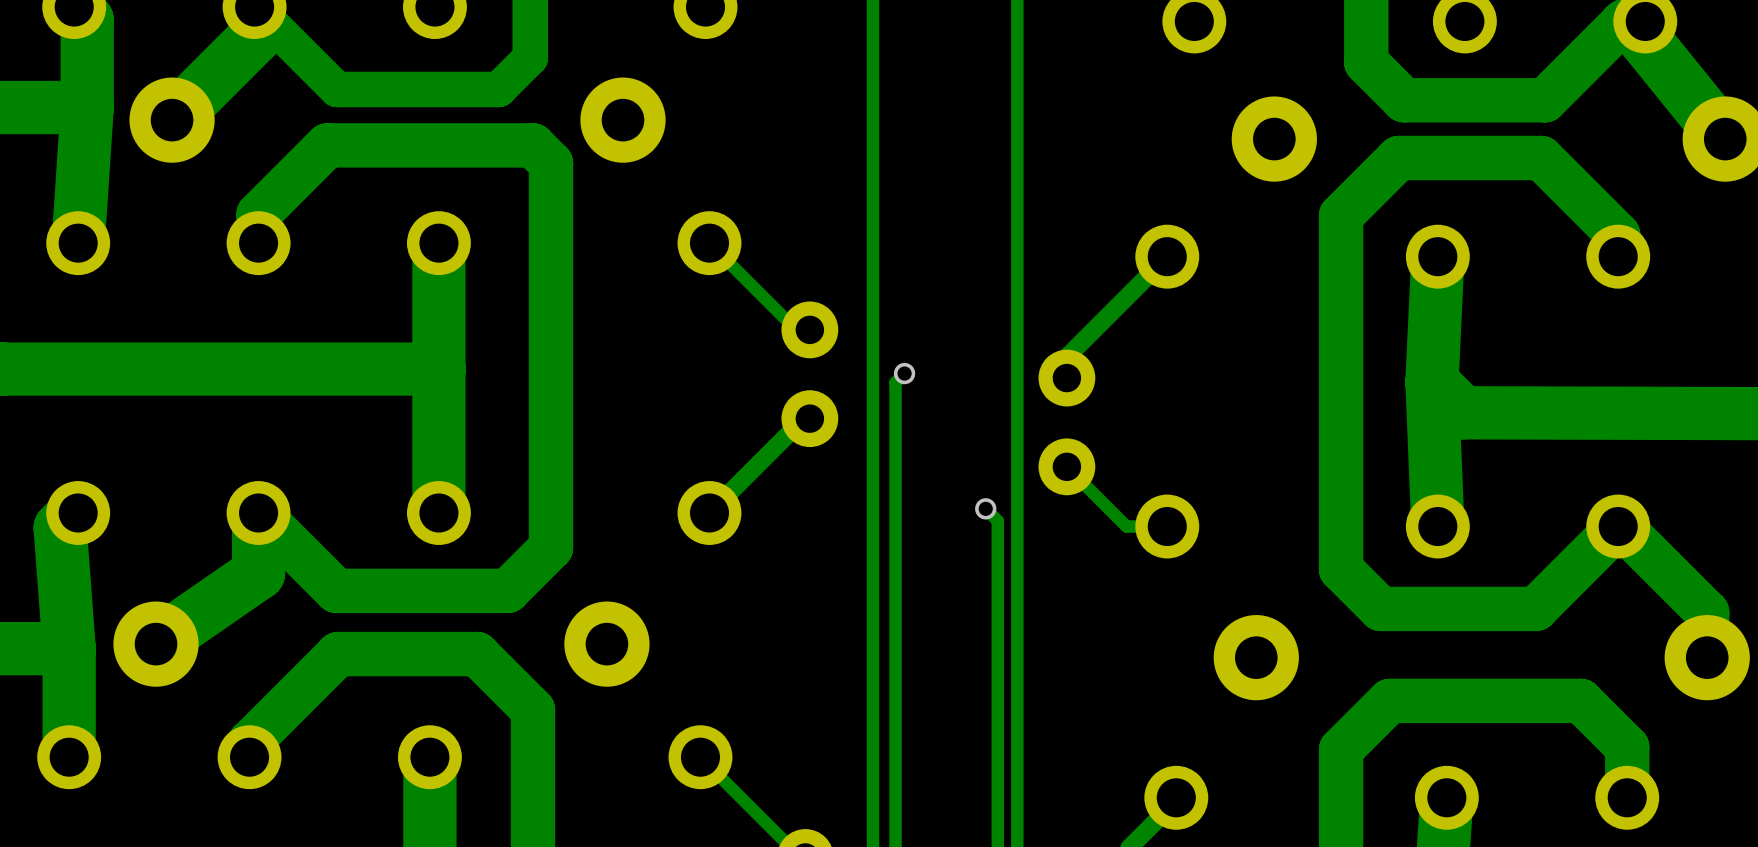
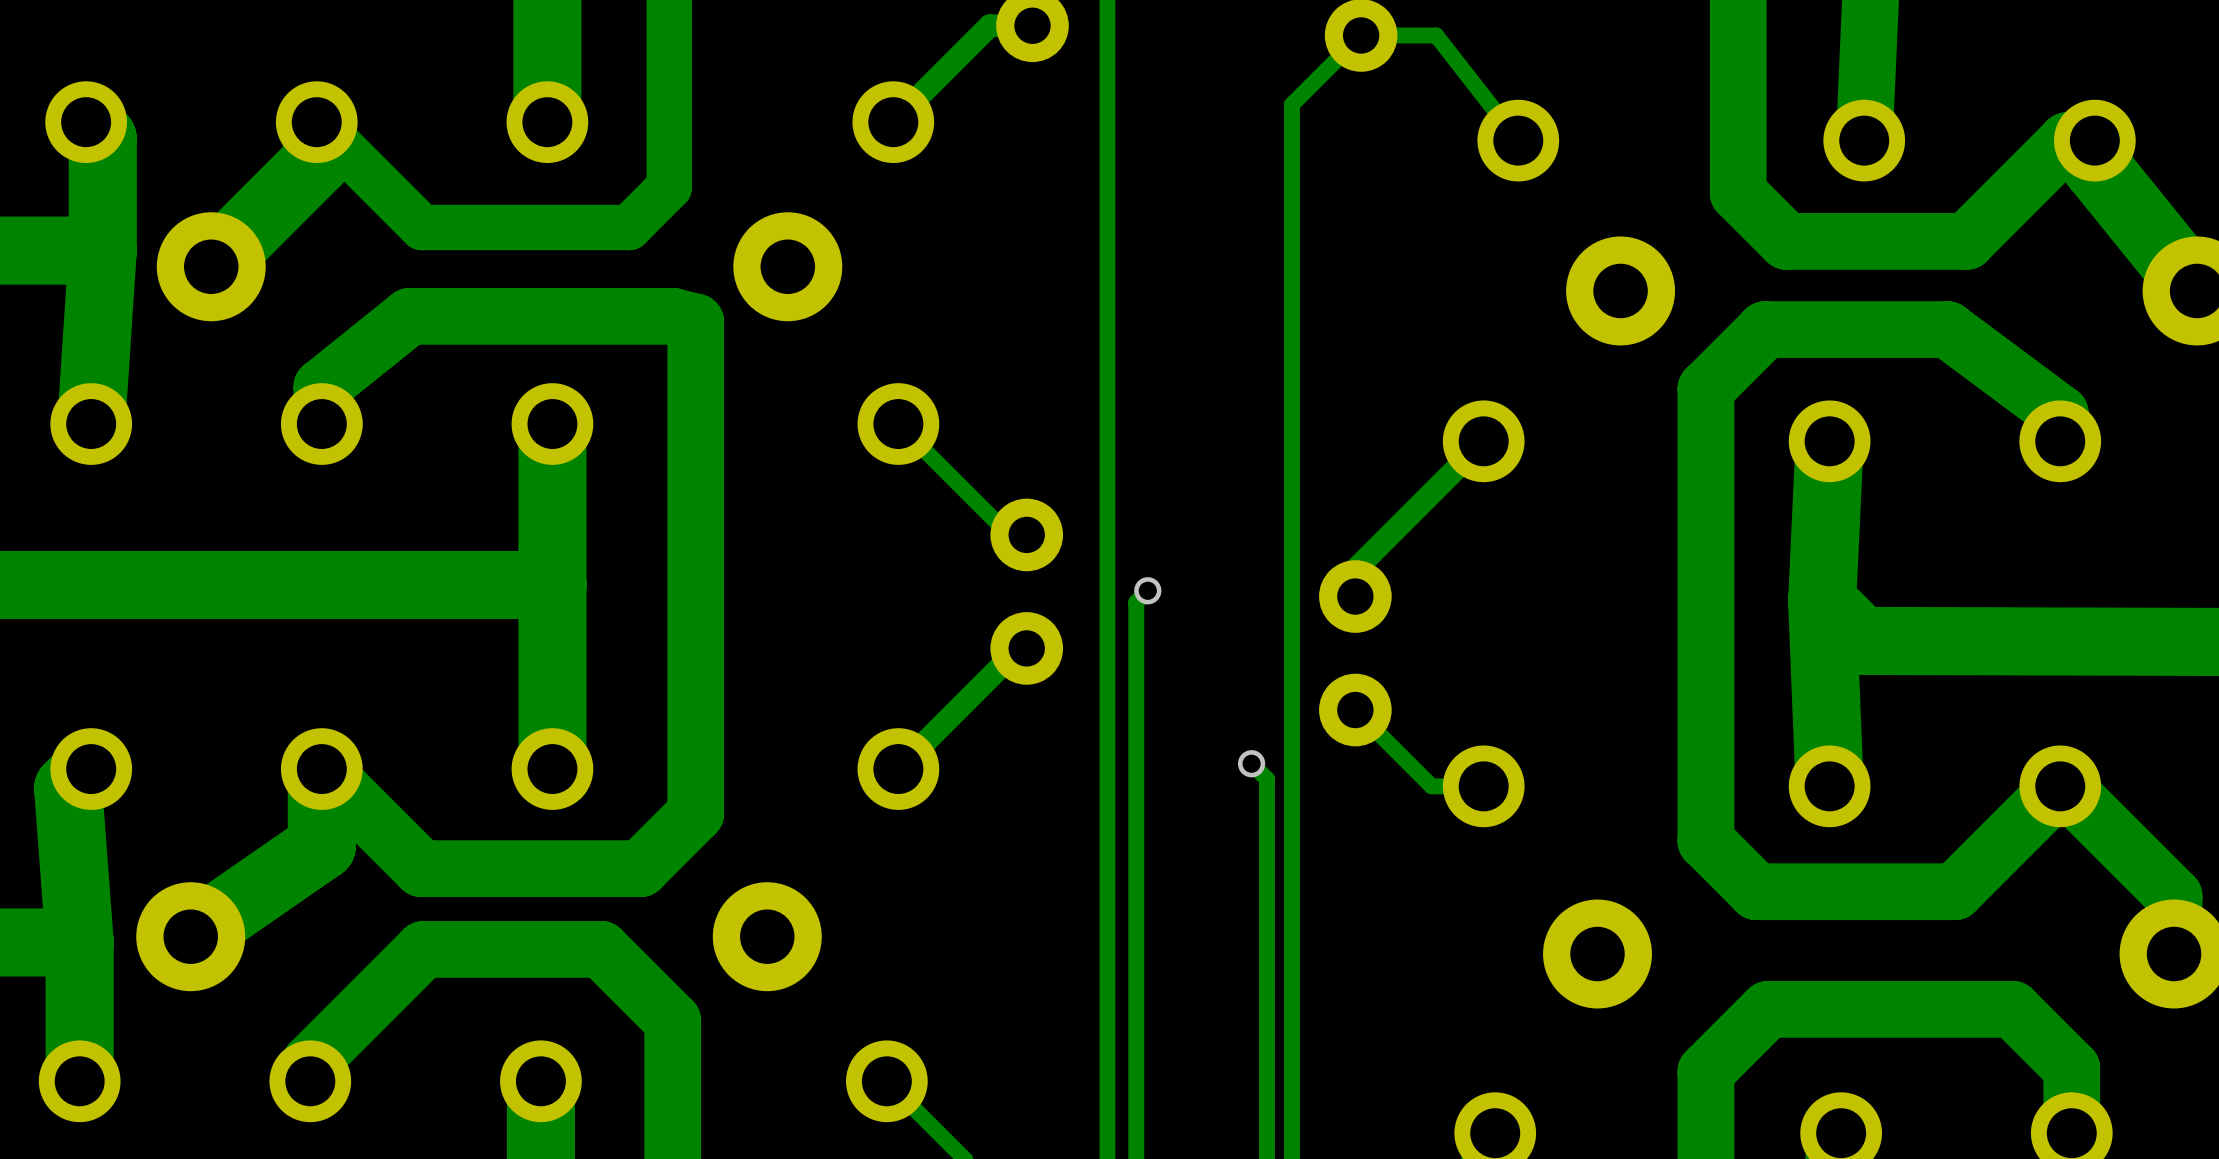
track: (551, 163) (533, 145) (327, 145) (258, 214) -> (695, 322) (672, 316) (409, 316) (321, 387)
track: (1387, 169) (1398, 158) (1541, 158) (1618, 234) -> (1765, 329) (1947, 329) (2060, 413)

